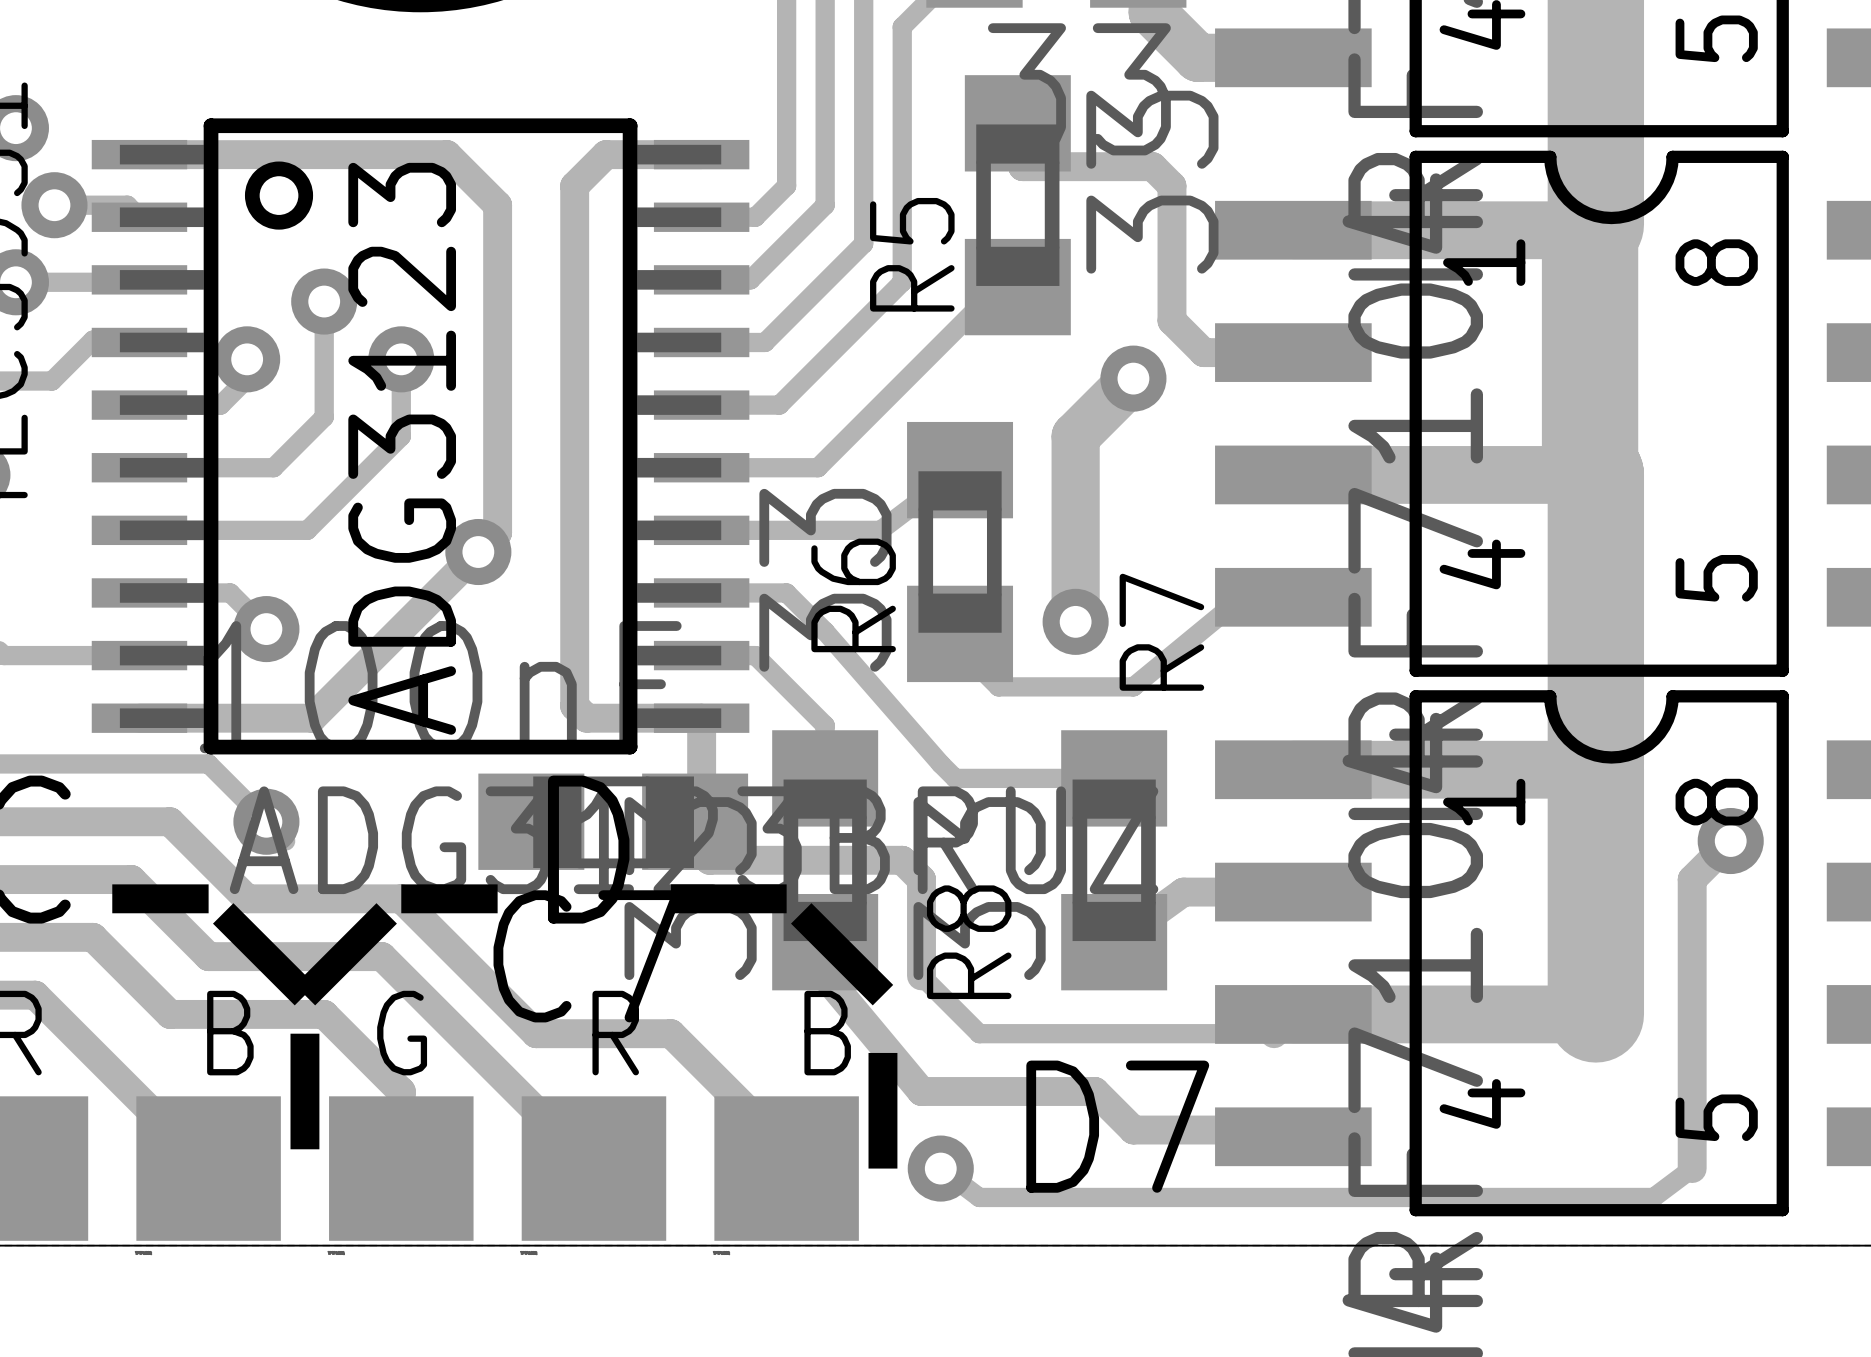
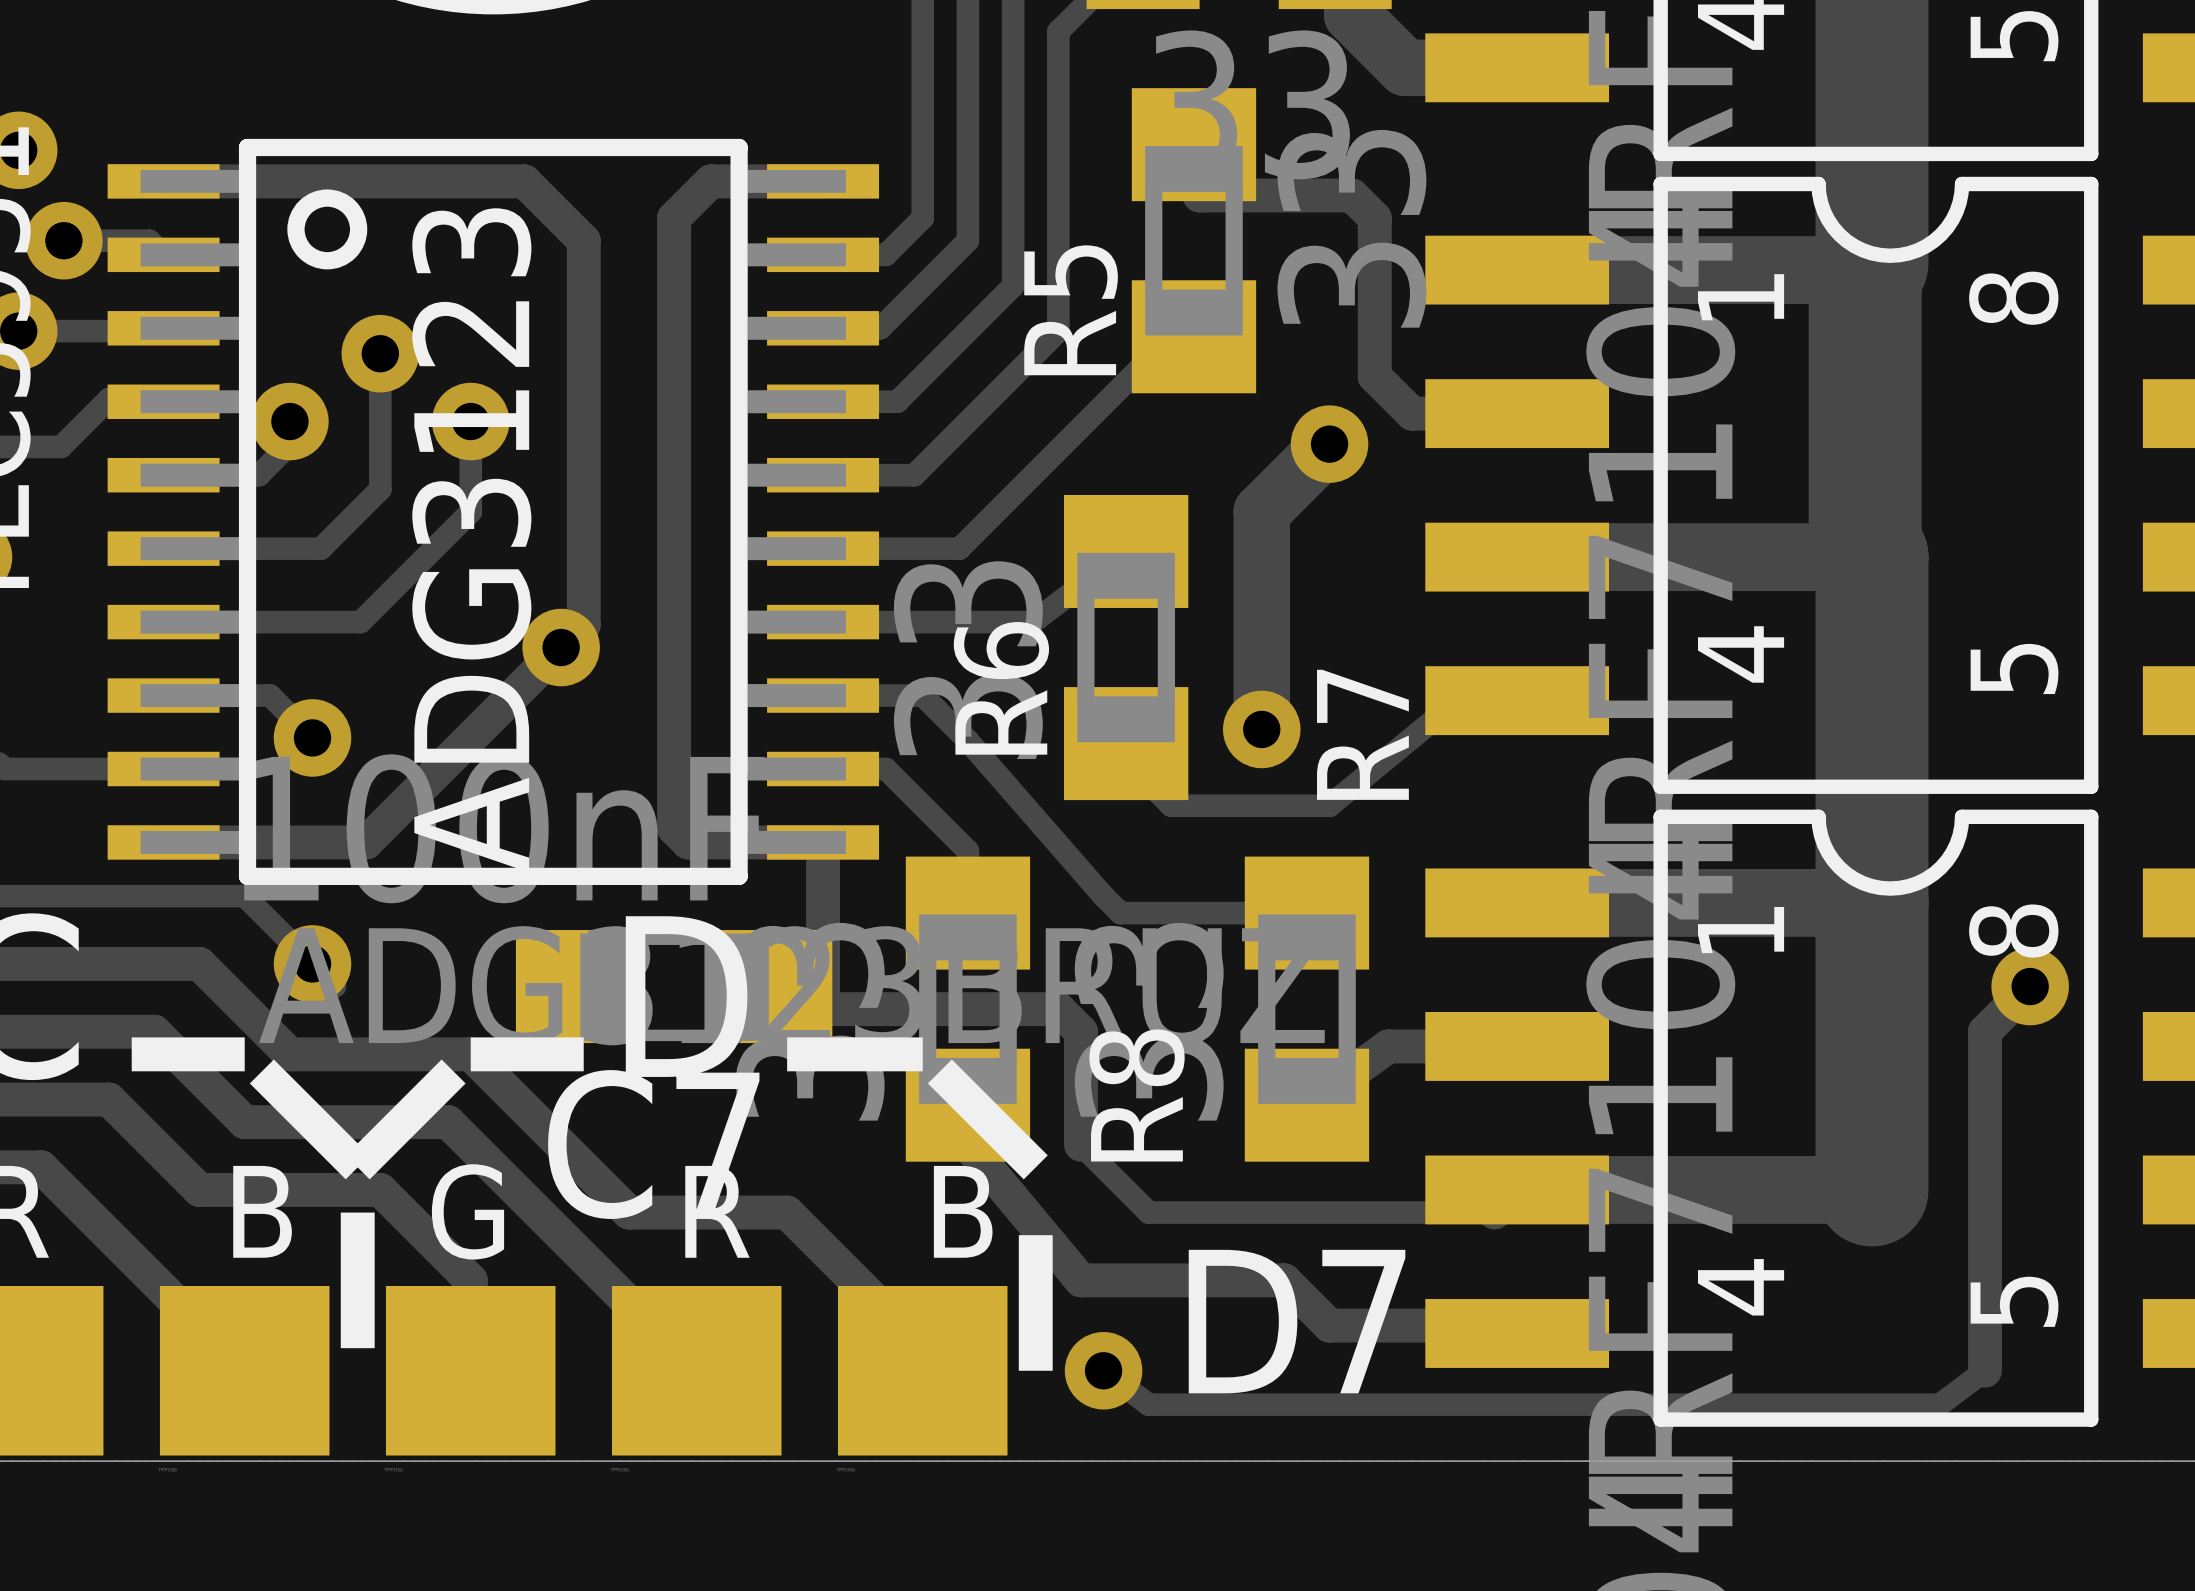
C7 position: (613, 821) -> (674, 986)

